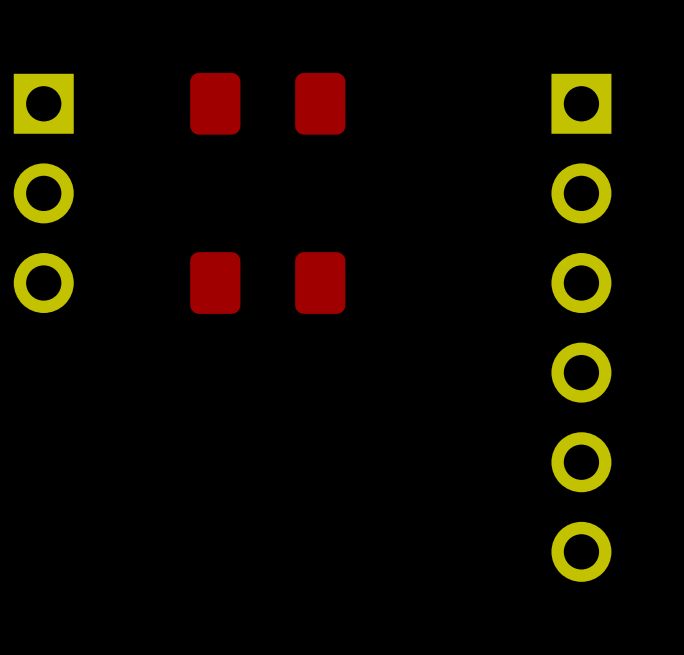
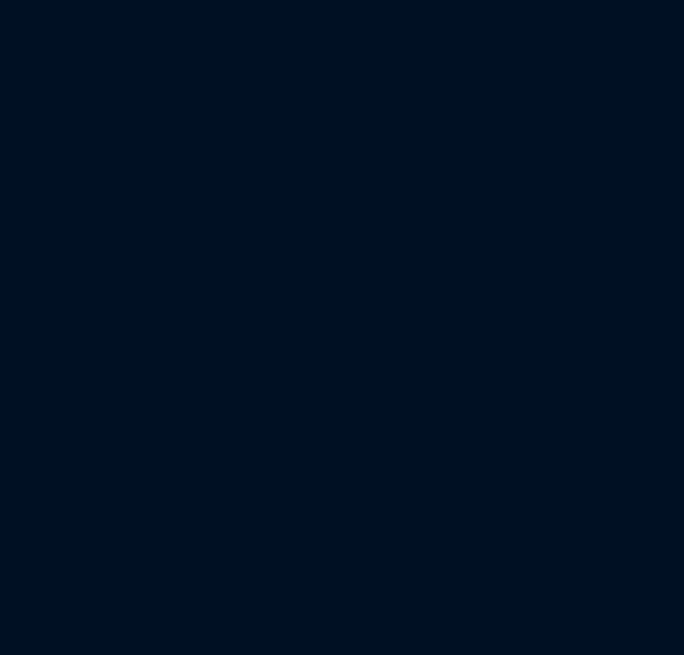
part: (267, 103) -> none
part: (43, 193) -> none
part: (267, 283) -> none
part: (581, 327) -> none

